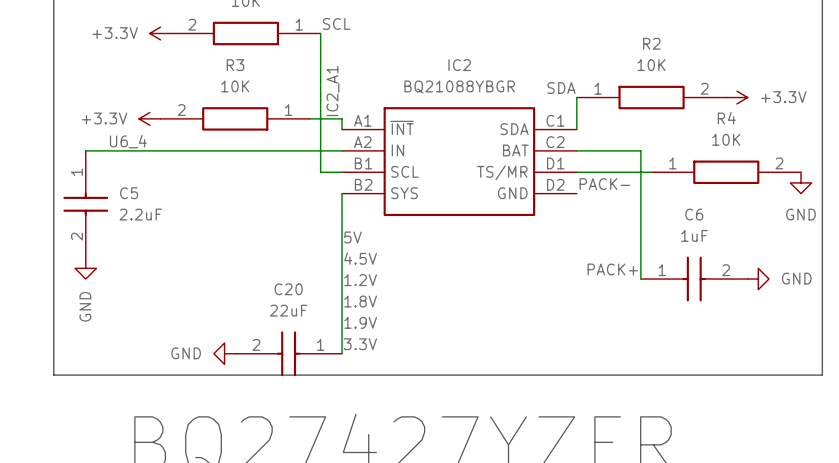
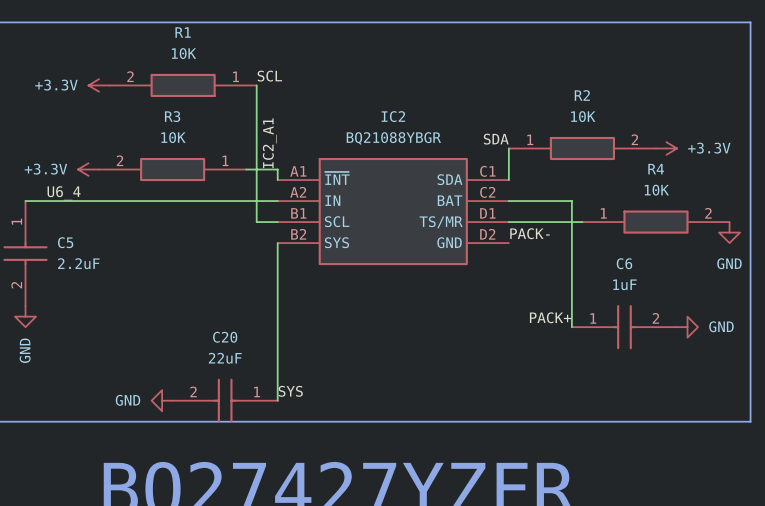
label: 5V (352, 237) -> none
label: 4.5V (360, 258) -> none
label: 1.2V (360, 280) -> none
label: 1.8V (360, 301) -> none
label: 1.9V (360, 322) -> none
label: 3.3V (360, 344) -> SYS (290, 391)

